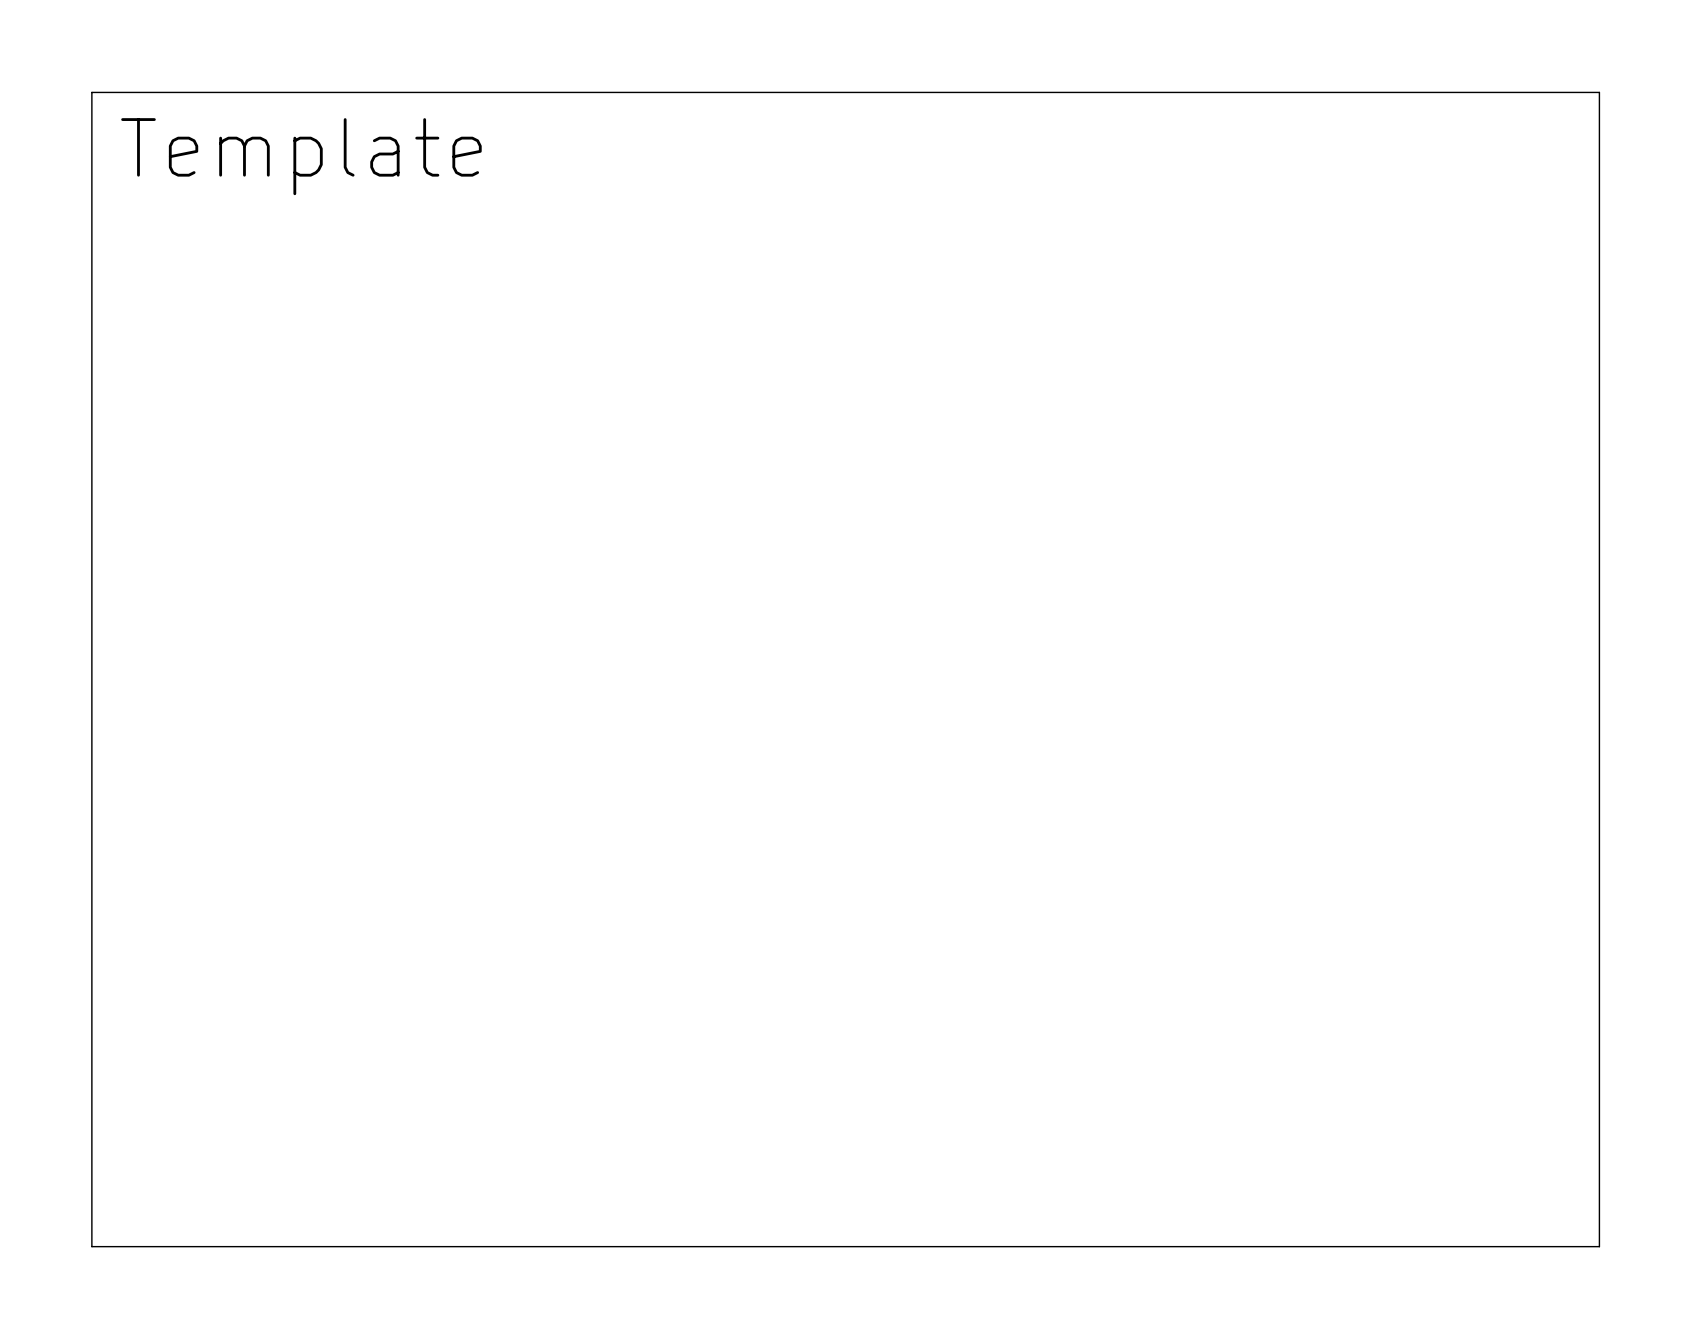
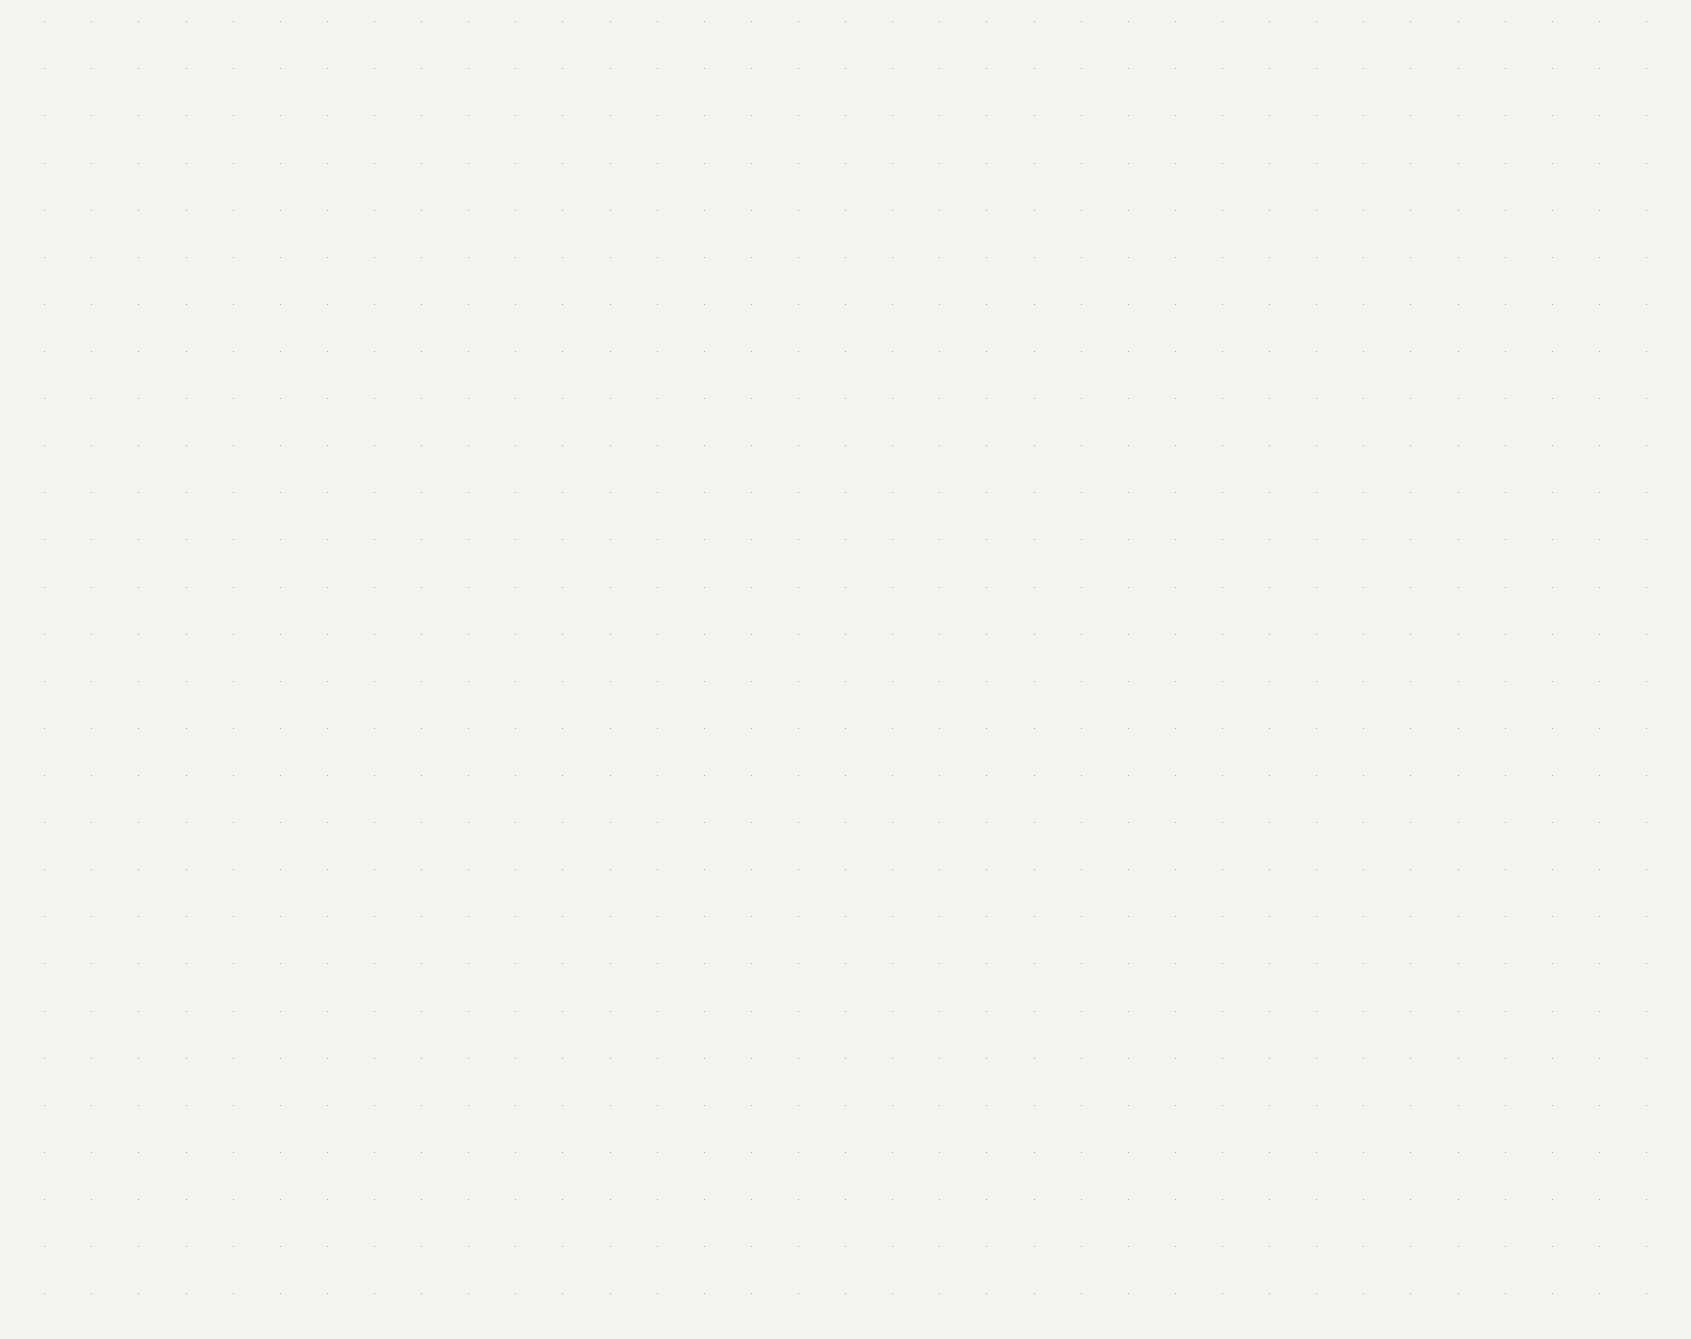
line: (91, 92) (91, 1246) (1599, 1246) (1599, 92) (91, 92) -> none
text: Template (301, 156) -> none

